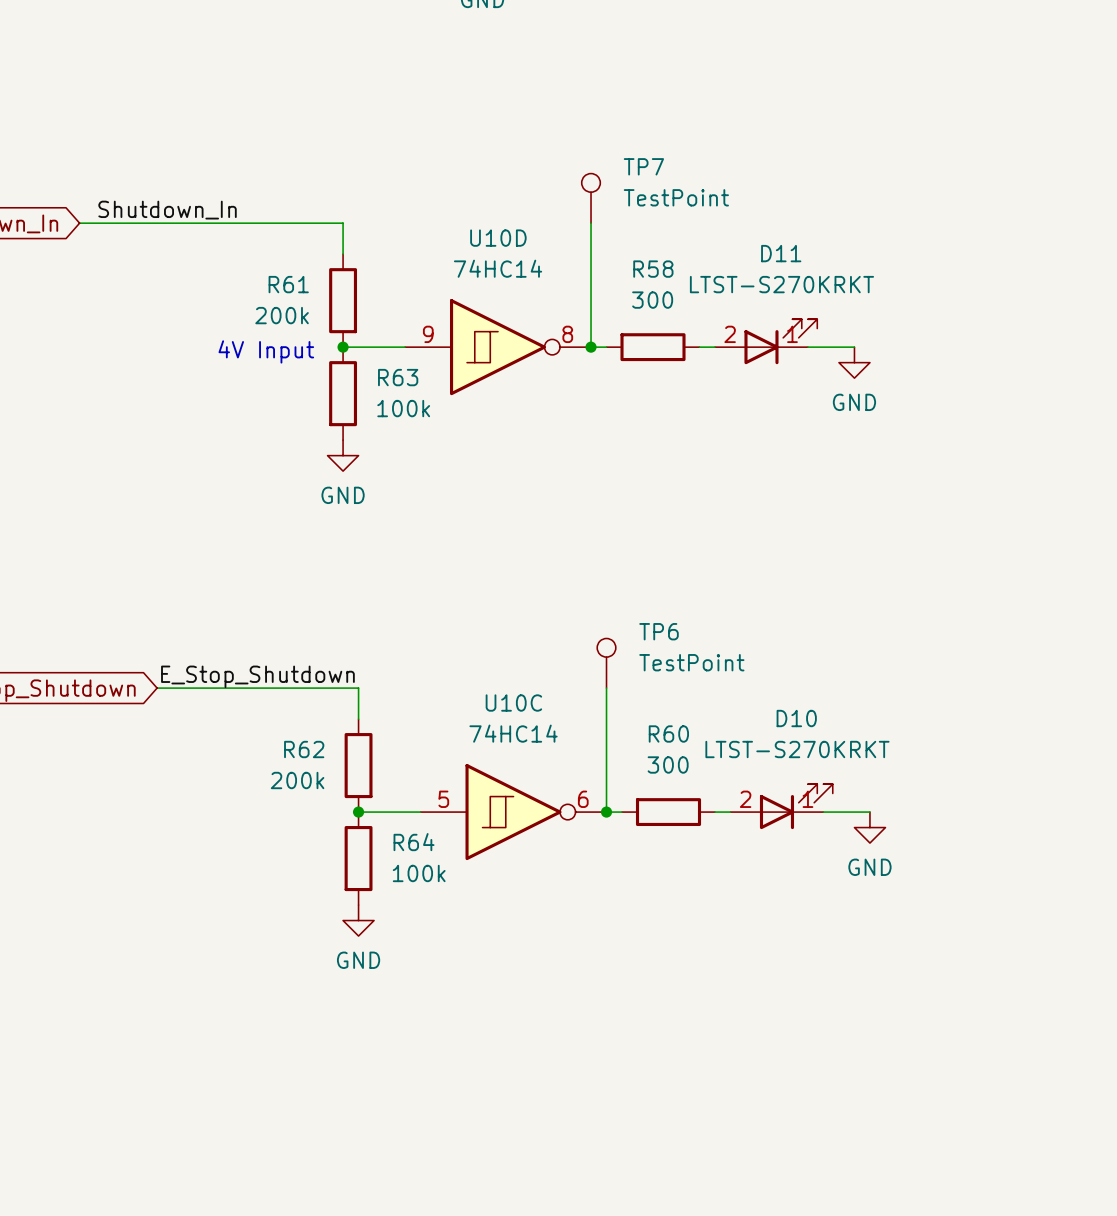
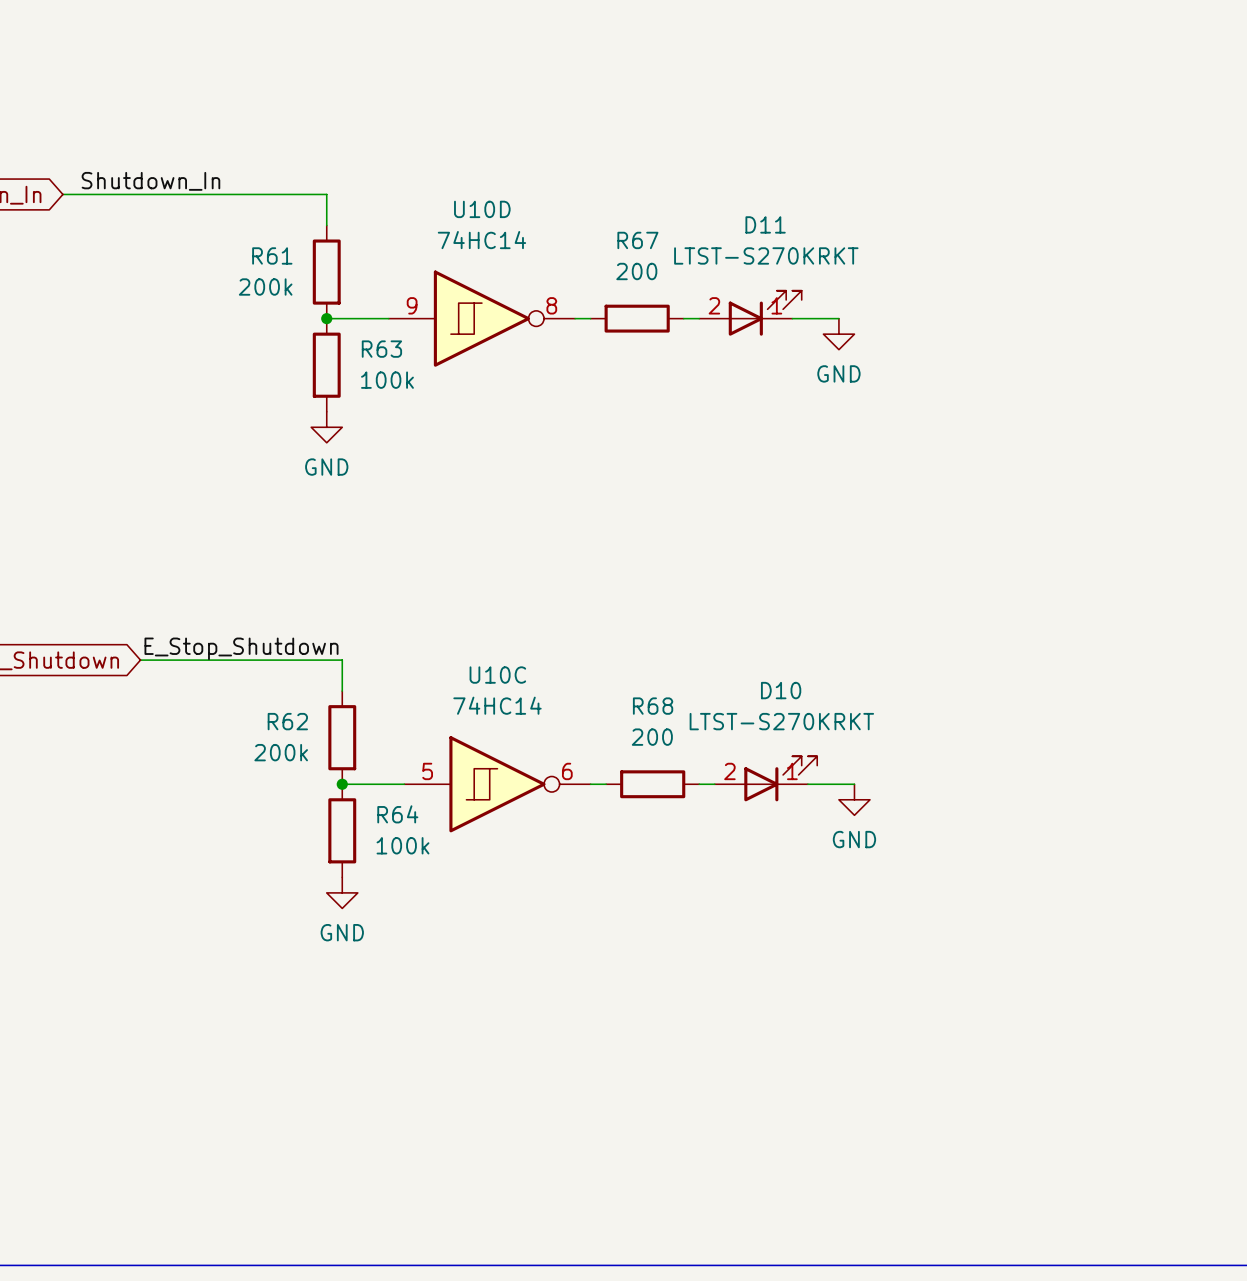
TP7: TestPoint (591, 198) -> none
wire: (591, 223) (591, 347) -> none
R58 name: R58 (653, 269) -> R67 (637, 240)
R58 value: 300 (652, 300) -> 200 (636, 271)
junction: (591, 347) -> none
text: 4V Input (266, 351) -> none
TP6: TestPoint (606, 663) -> none
wire: (606, 688) (606, 812) -> none
R60 name: R60 (668, 734) -> R68 (653, 706)
R60 value: 300 (668, 764) -> 200 (652, 737)
junction: (606, 812) -> none

